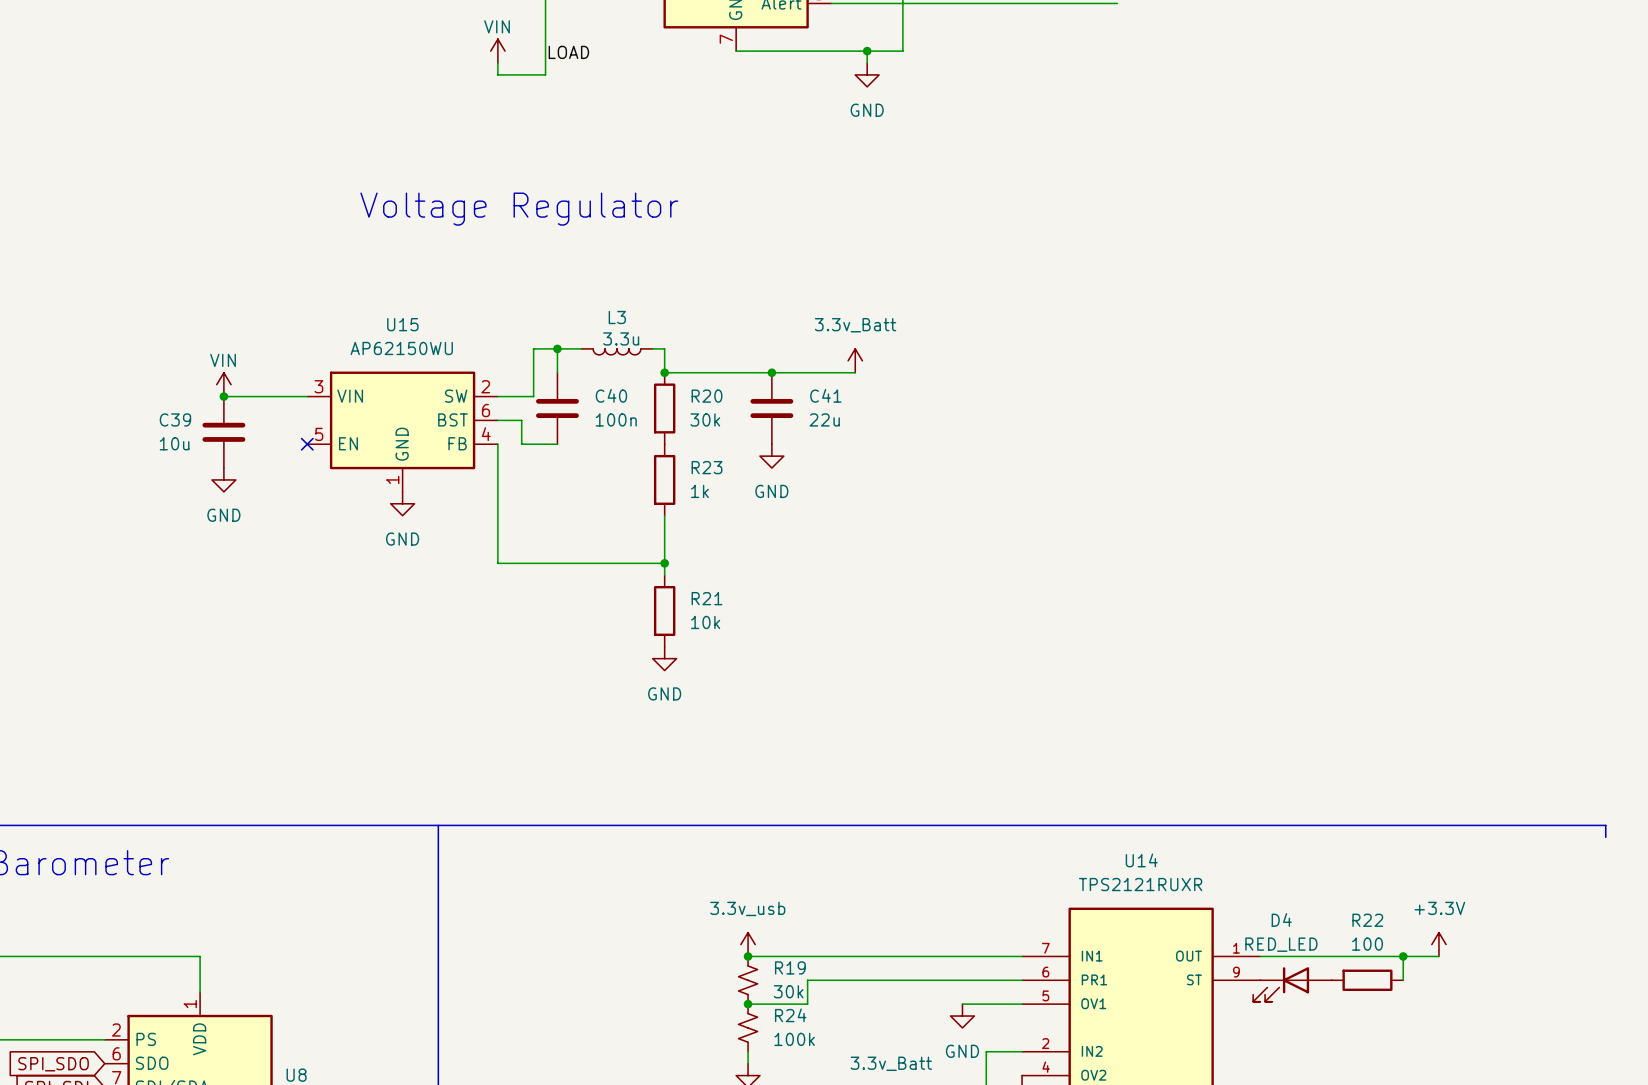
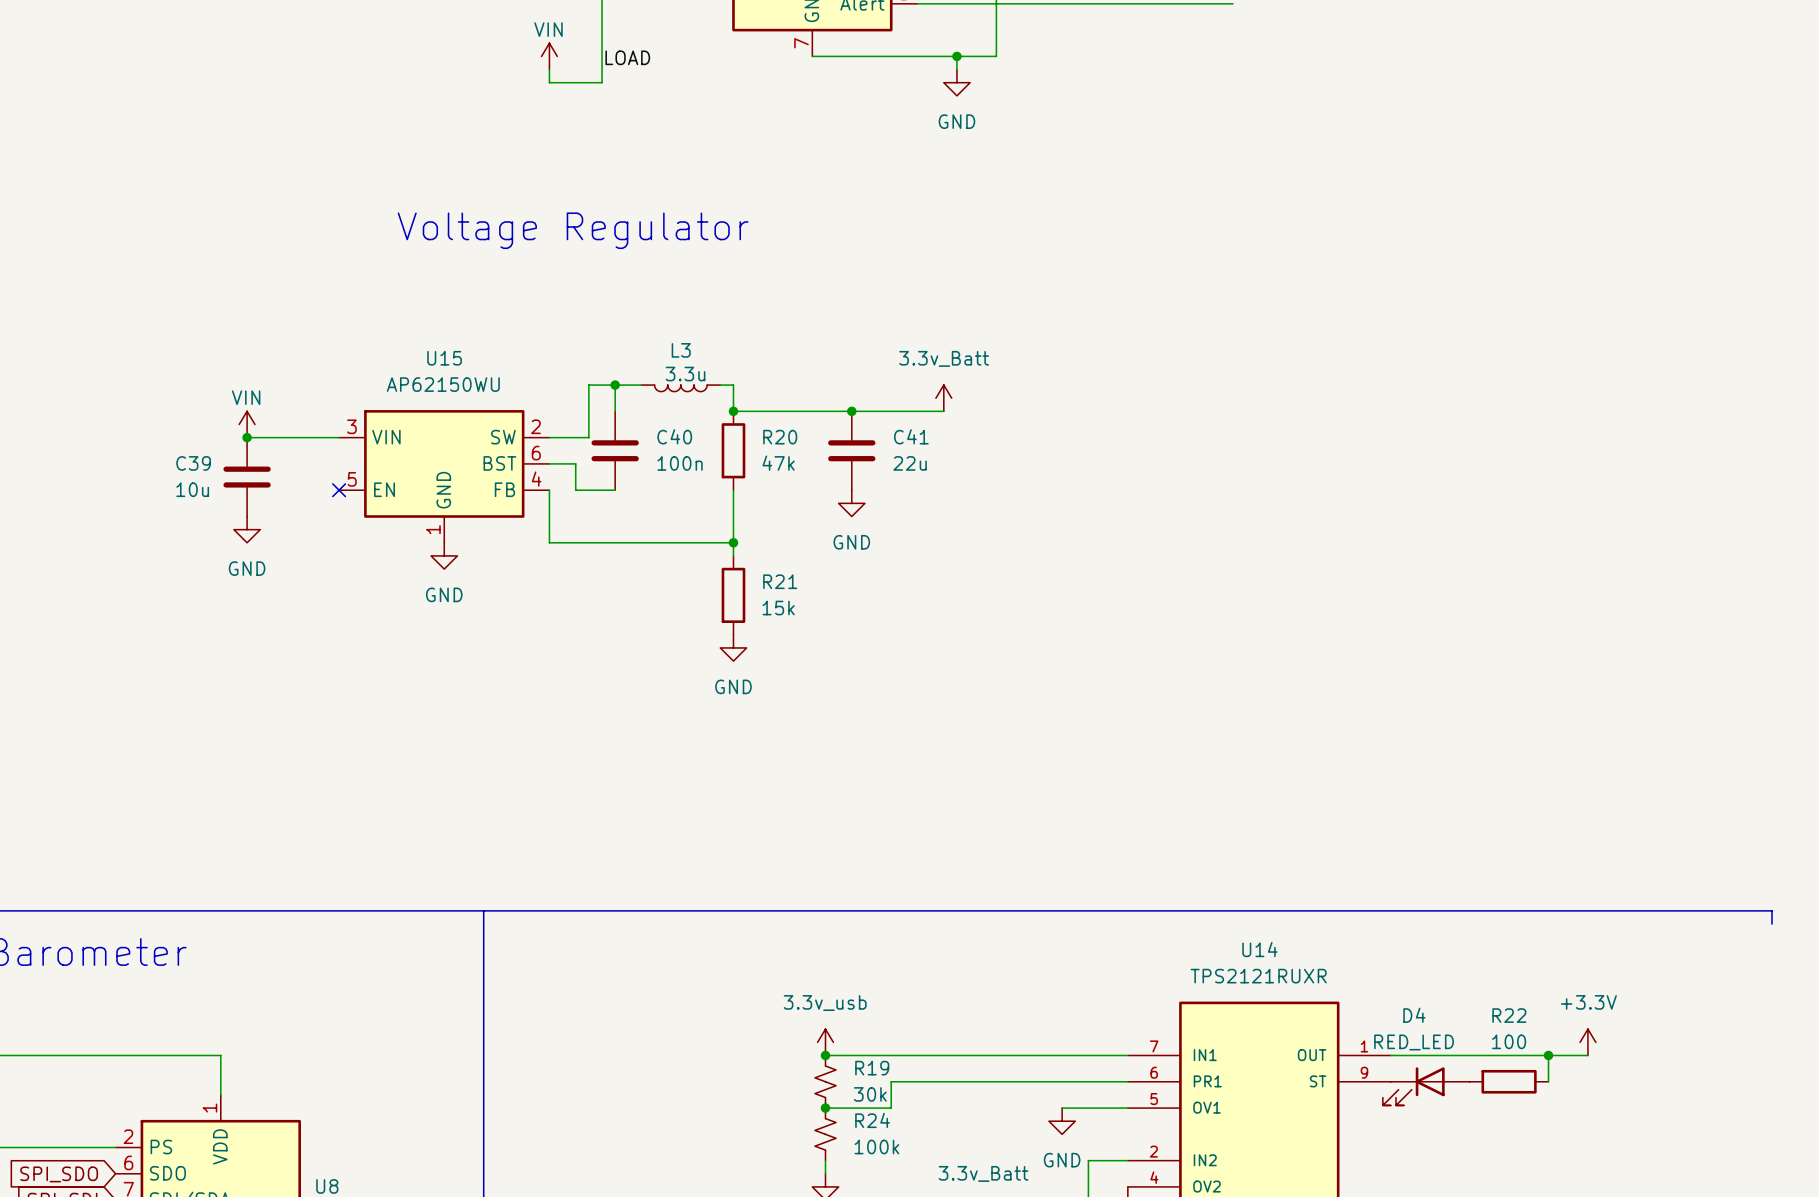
R20 value: 30k (705, 419) -> 47k (778, 463)
R23: 1k (664, 479) -> none
wire: (497, 491) (497, 563) (664, 563) -> (549, 542) (733, 542)
junction: none -> (733, 542)
wire: (664, 515) (664, 575) -> (733, 490) (733, 555)
junction: (664, 563) -> none
R21 position: (664, 611) -> (733, 595)
R21 value: 10k (705, 622) -> 15k (778, 608)
power symbol position: GND (664, 658) -> GND (733, 647)

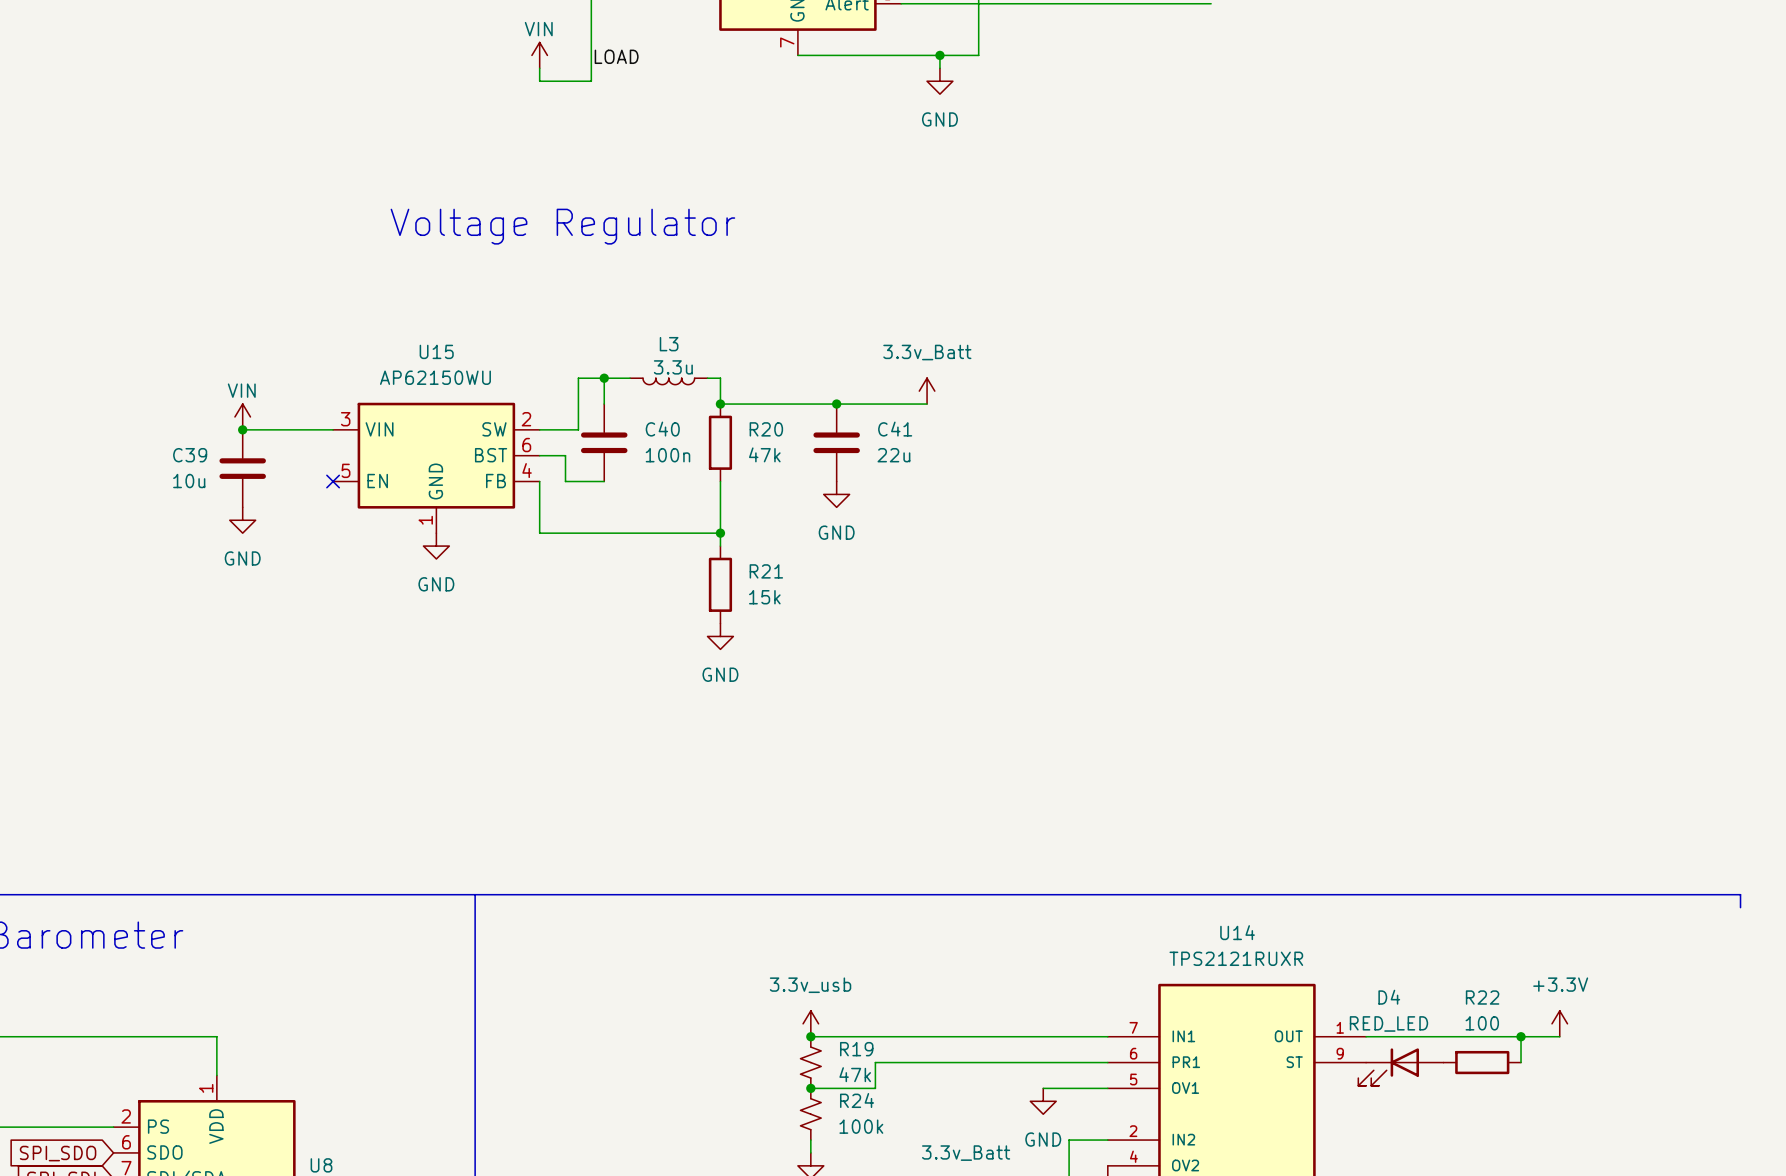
R19 value: 30k (870, 1094) -> 47k (855, 1074)

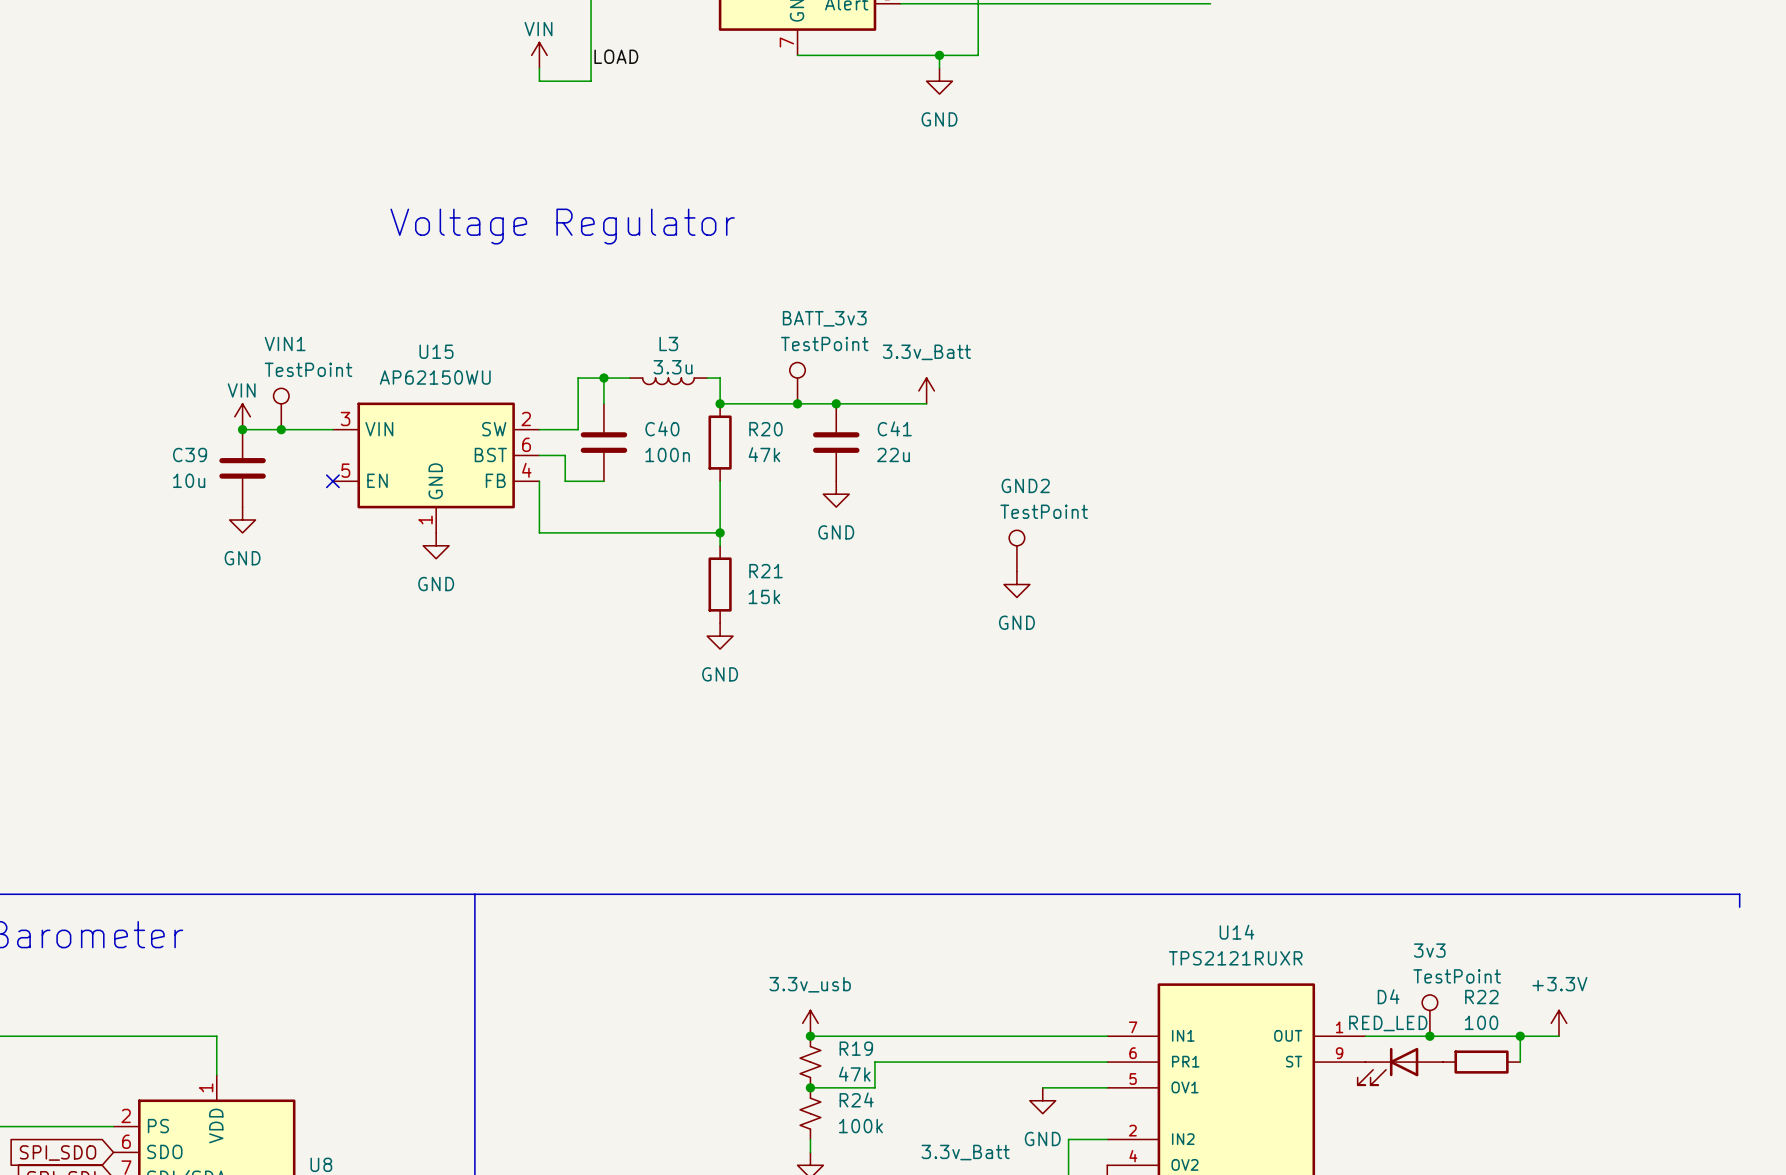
BATT_3v3: none -> TestPoint (797, 383)
junction: none -> (797, 403)
VIN1: none -> TestPoint (281, 409)
junction: none -> (281, 429)
GND2: none -> TestPoint (1016, 550)
power symbol: none -> GND (1016, 584)
3v3: none -> TestPoint (1429, 1015)
junction: none -> (1429, 1036)

